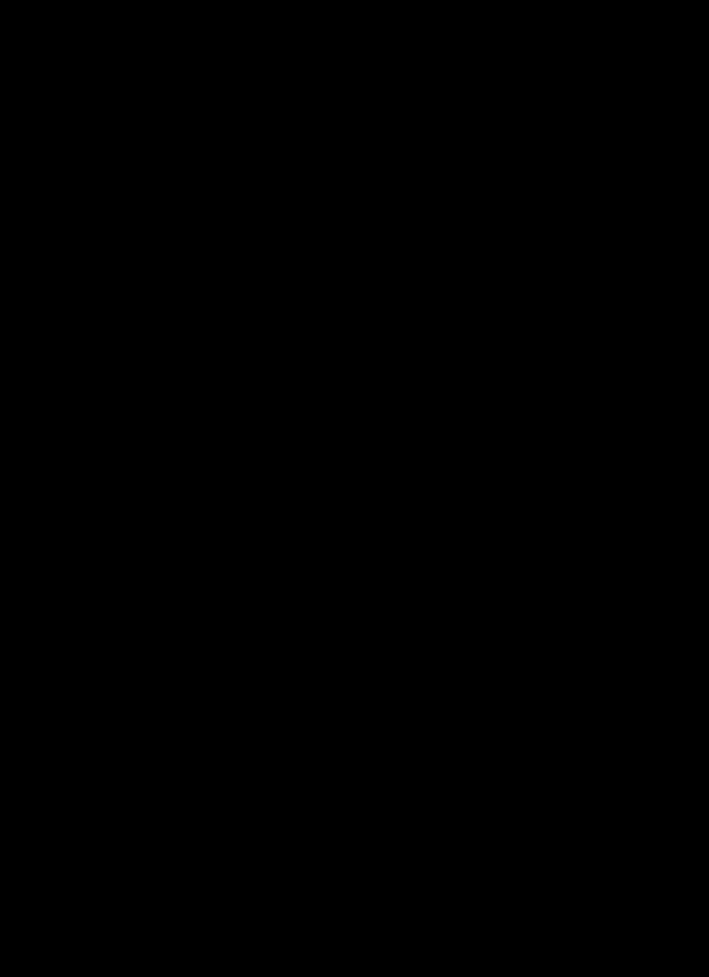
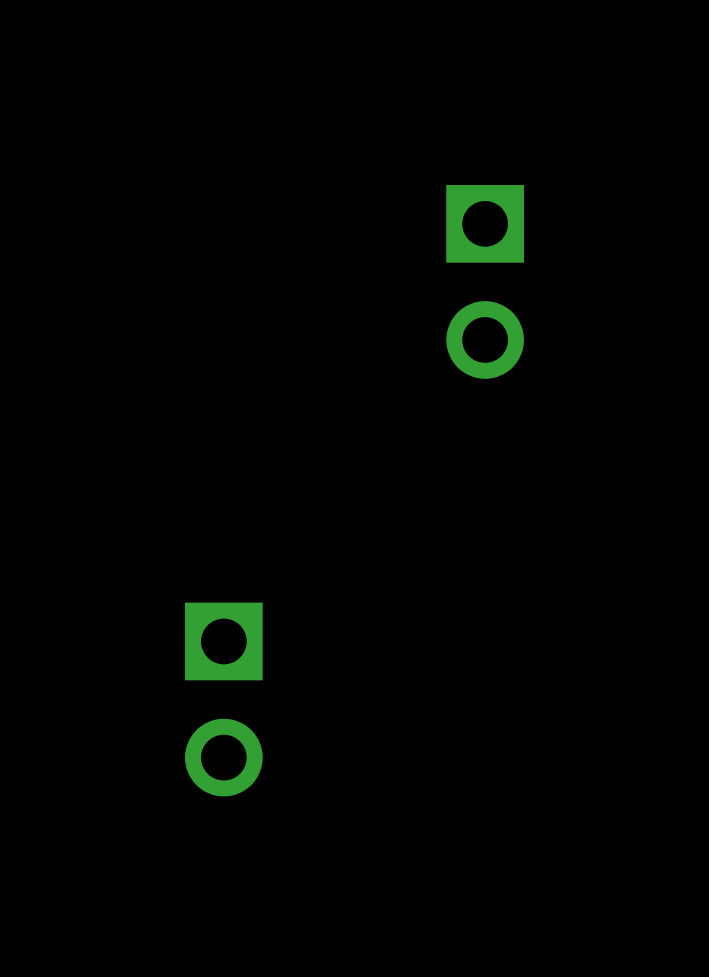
part: none -> (485, 281)
part: none -> (223, 699)

